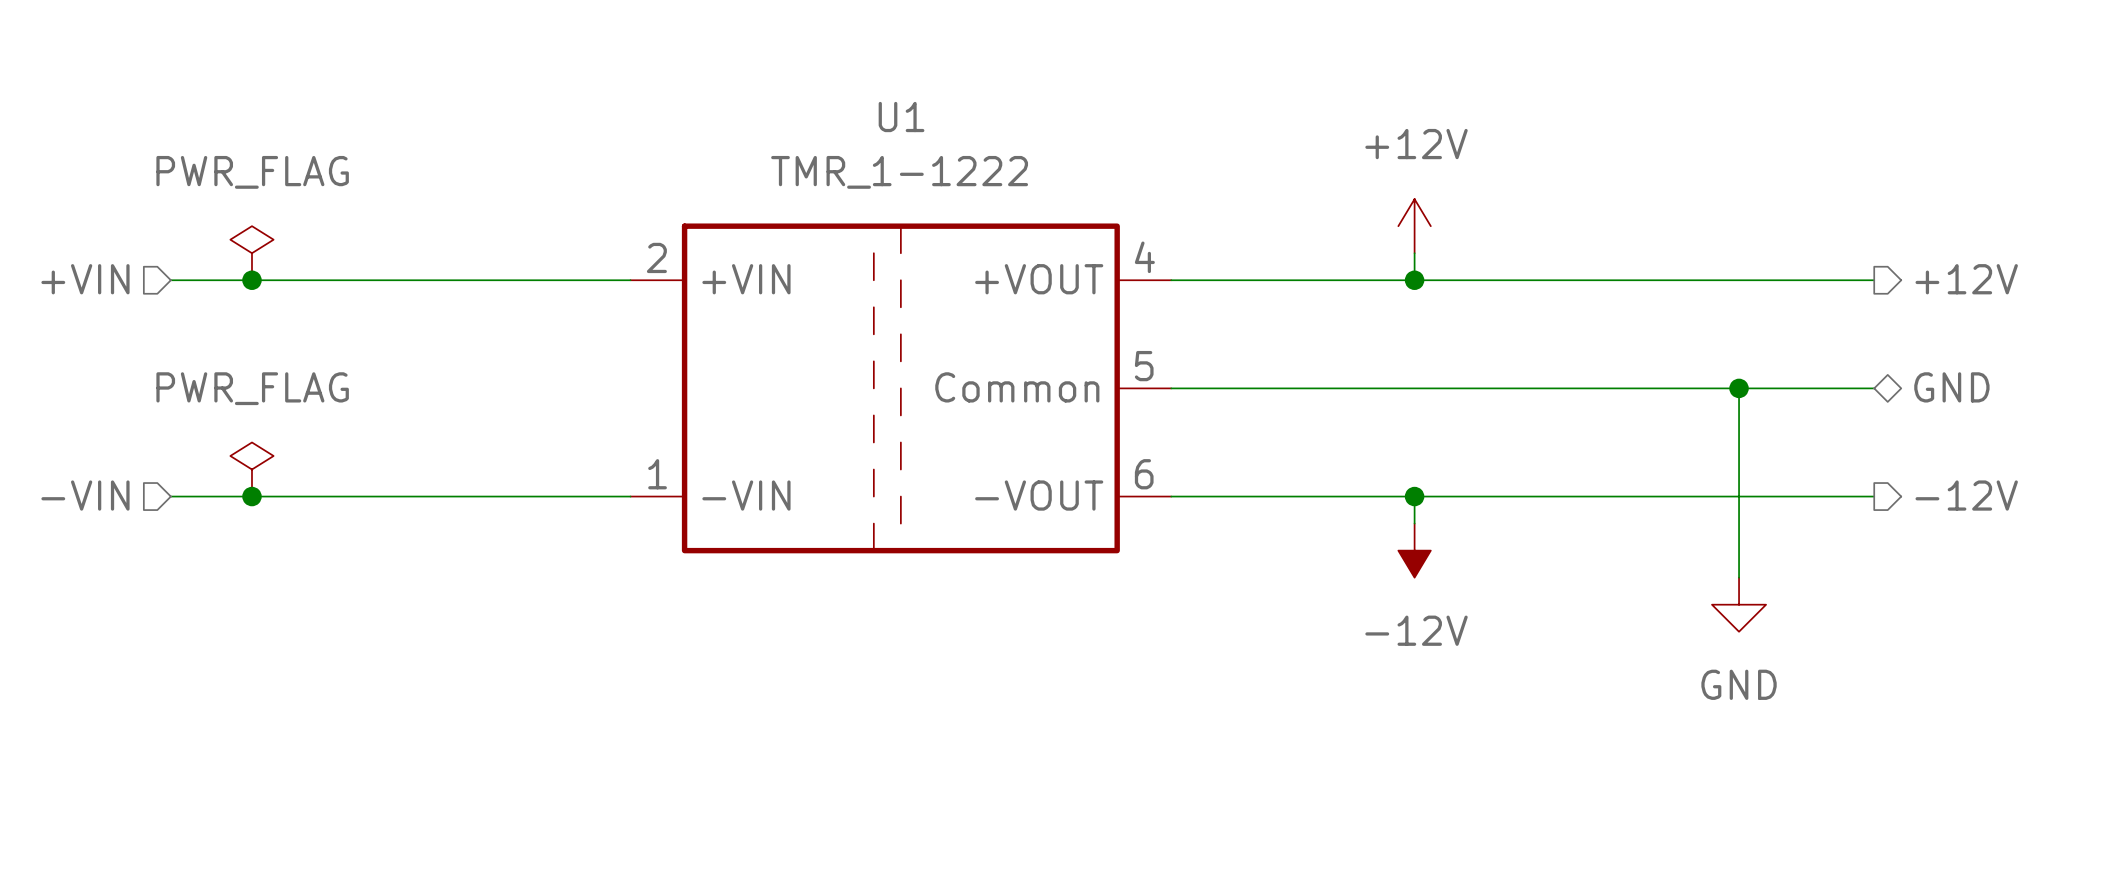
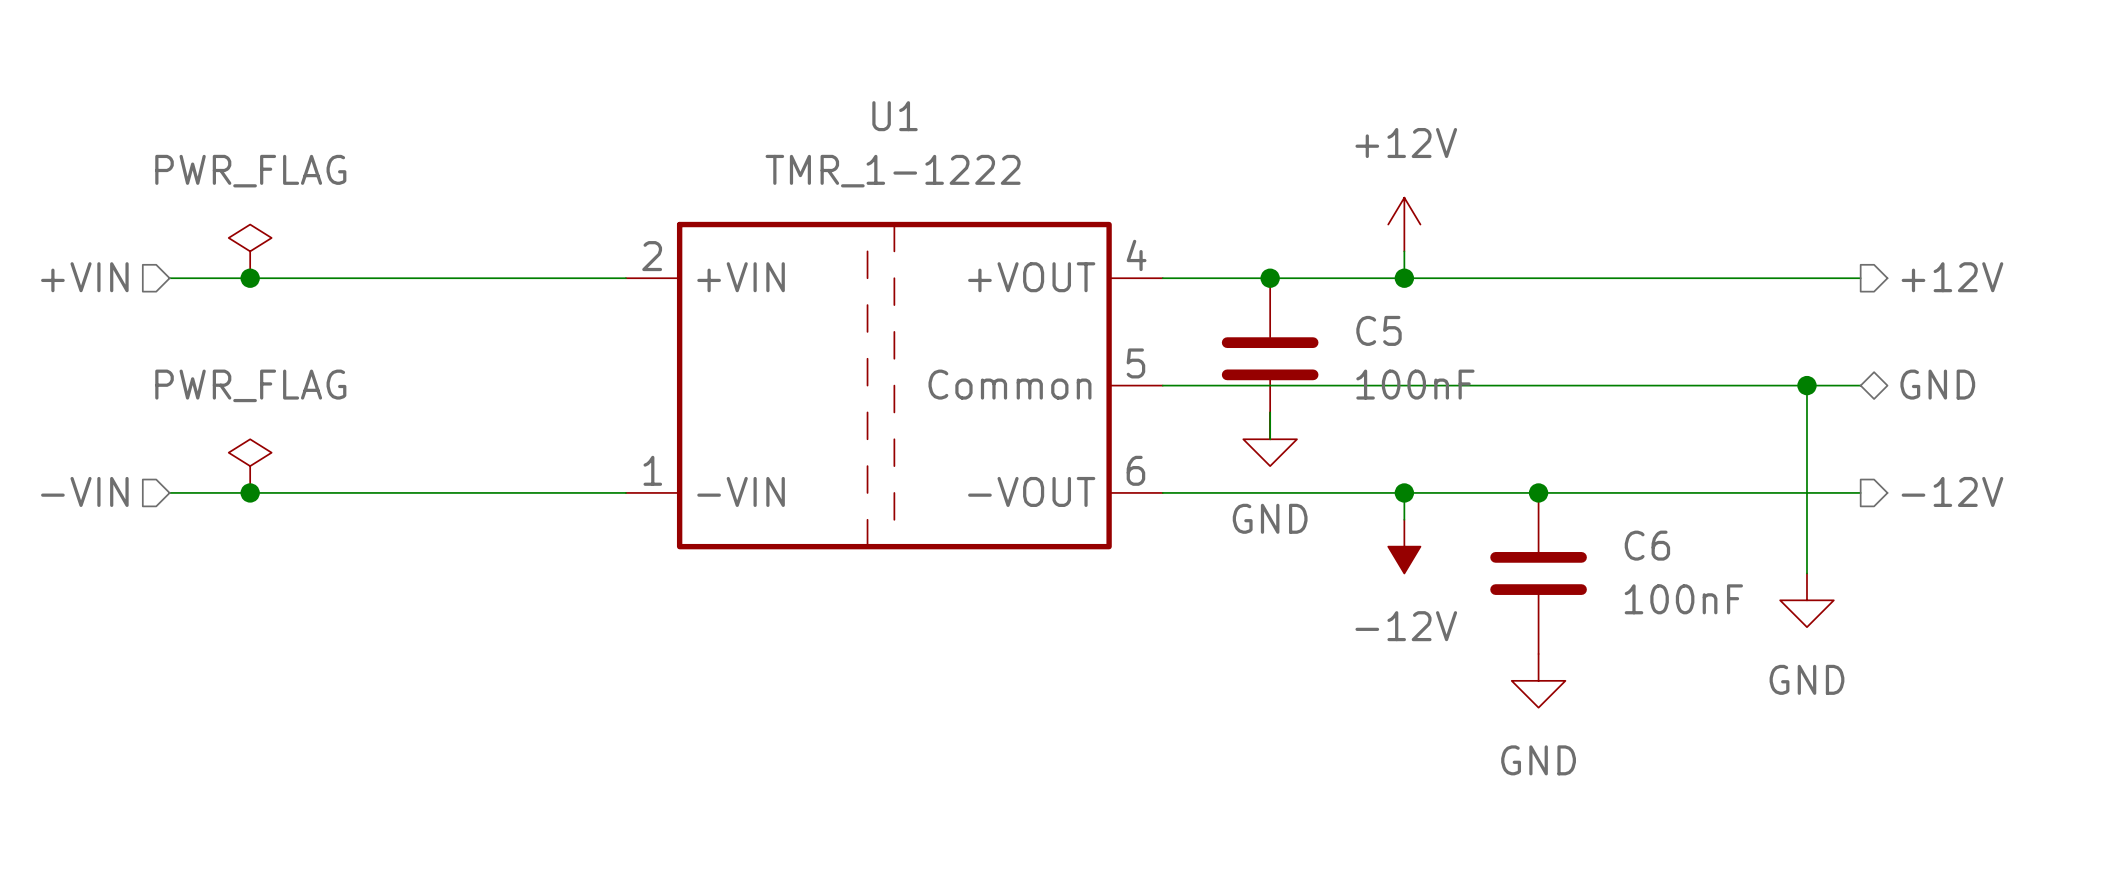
junction: none -> (1270, 278)
C5: none -> 100nF (1270, 358)
wire: (1739, 388) (1739, 577) -> (1806, 385) (1806, 573)
junction position: (1739, 388) -> (1806, 385)
wire: none -> (1270, 412) (1270, 439)
power symbol: none -> GND (1270, 439)
junction: none -> (1538, 492)
C6: none -> 100nF (1538, 573)
power symbol position: GND (1739, 604) -> GND (1806, 600)
power symbol: none -> GND (1538, 680)

